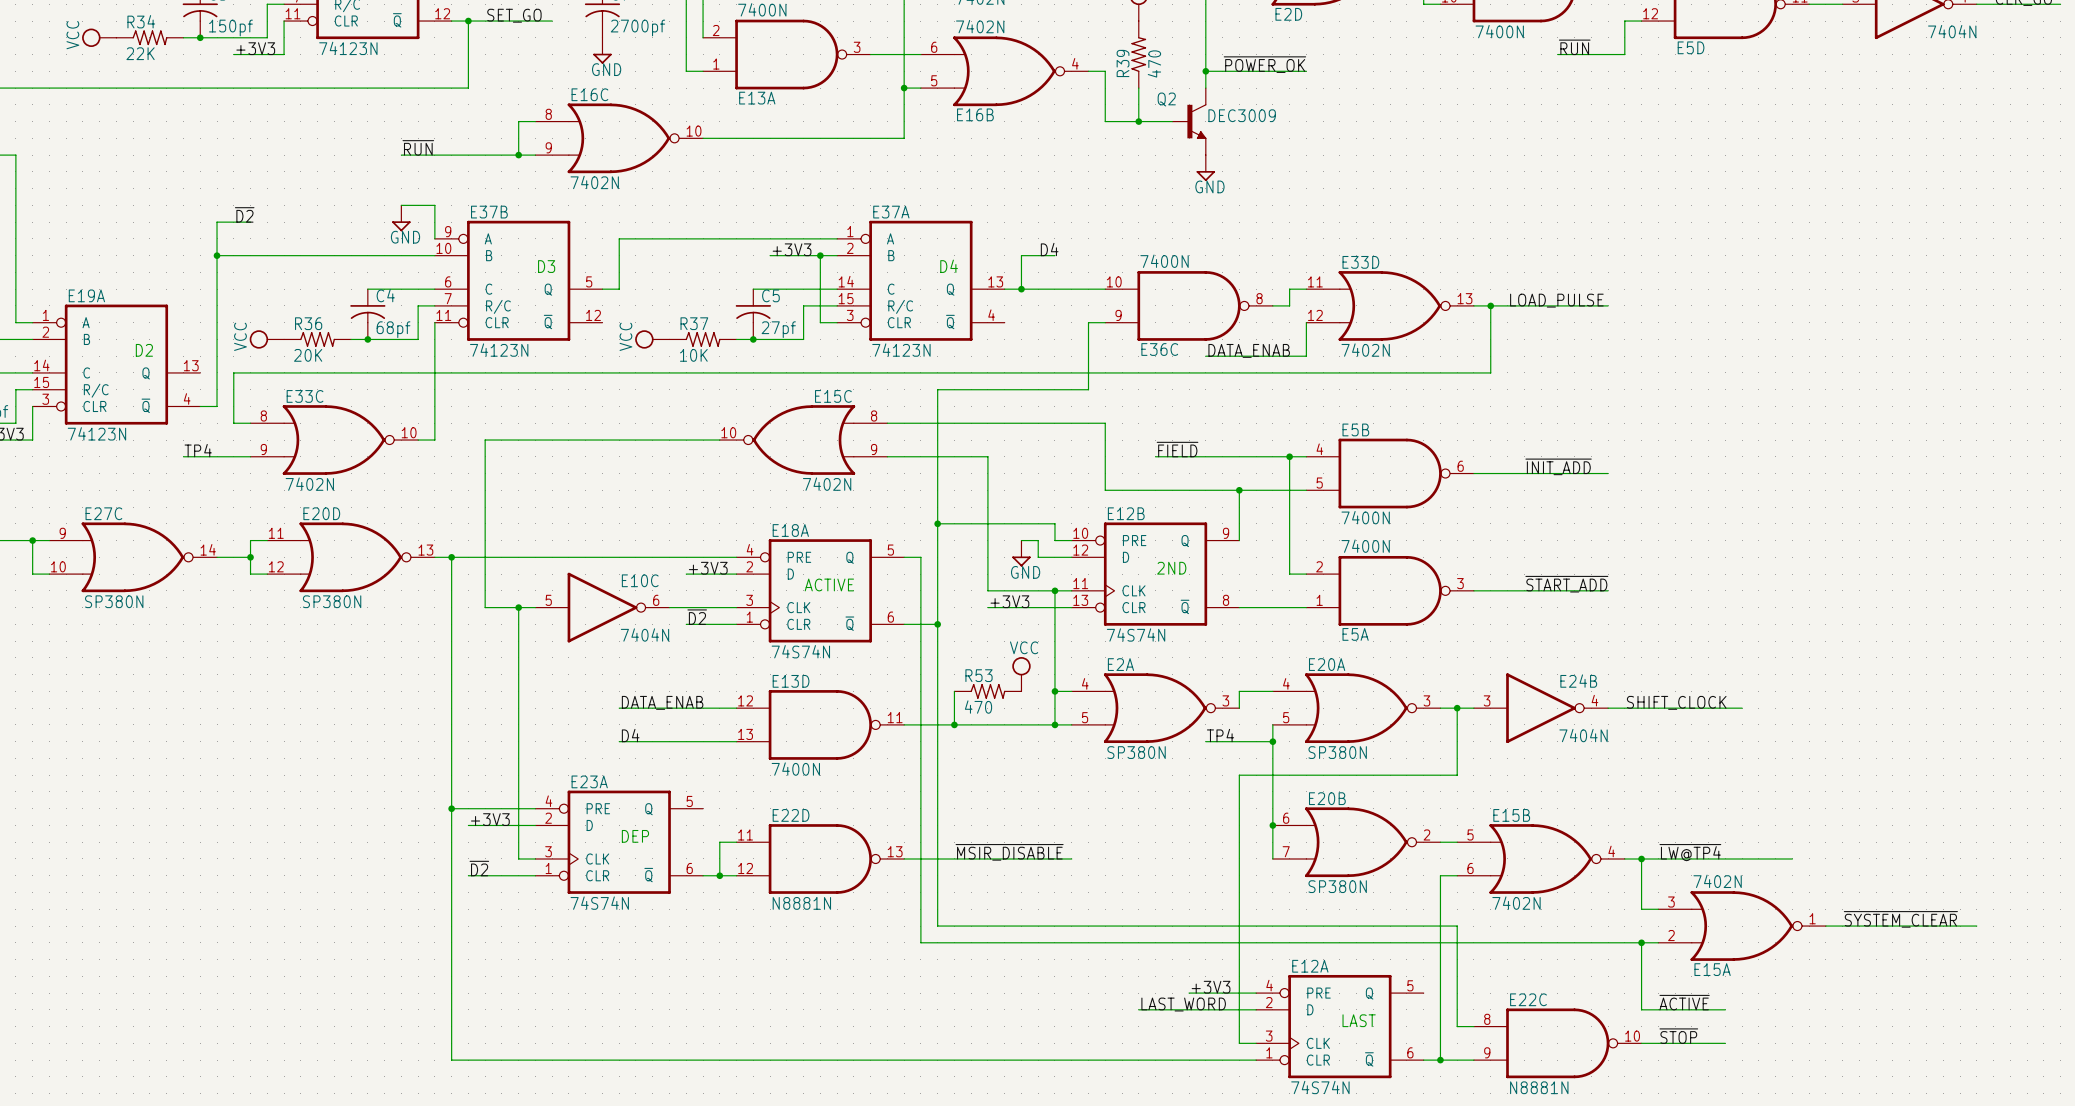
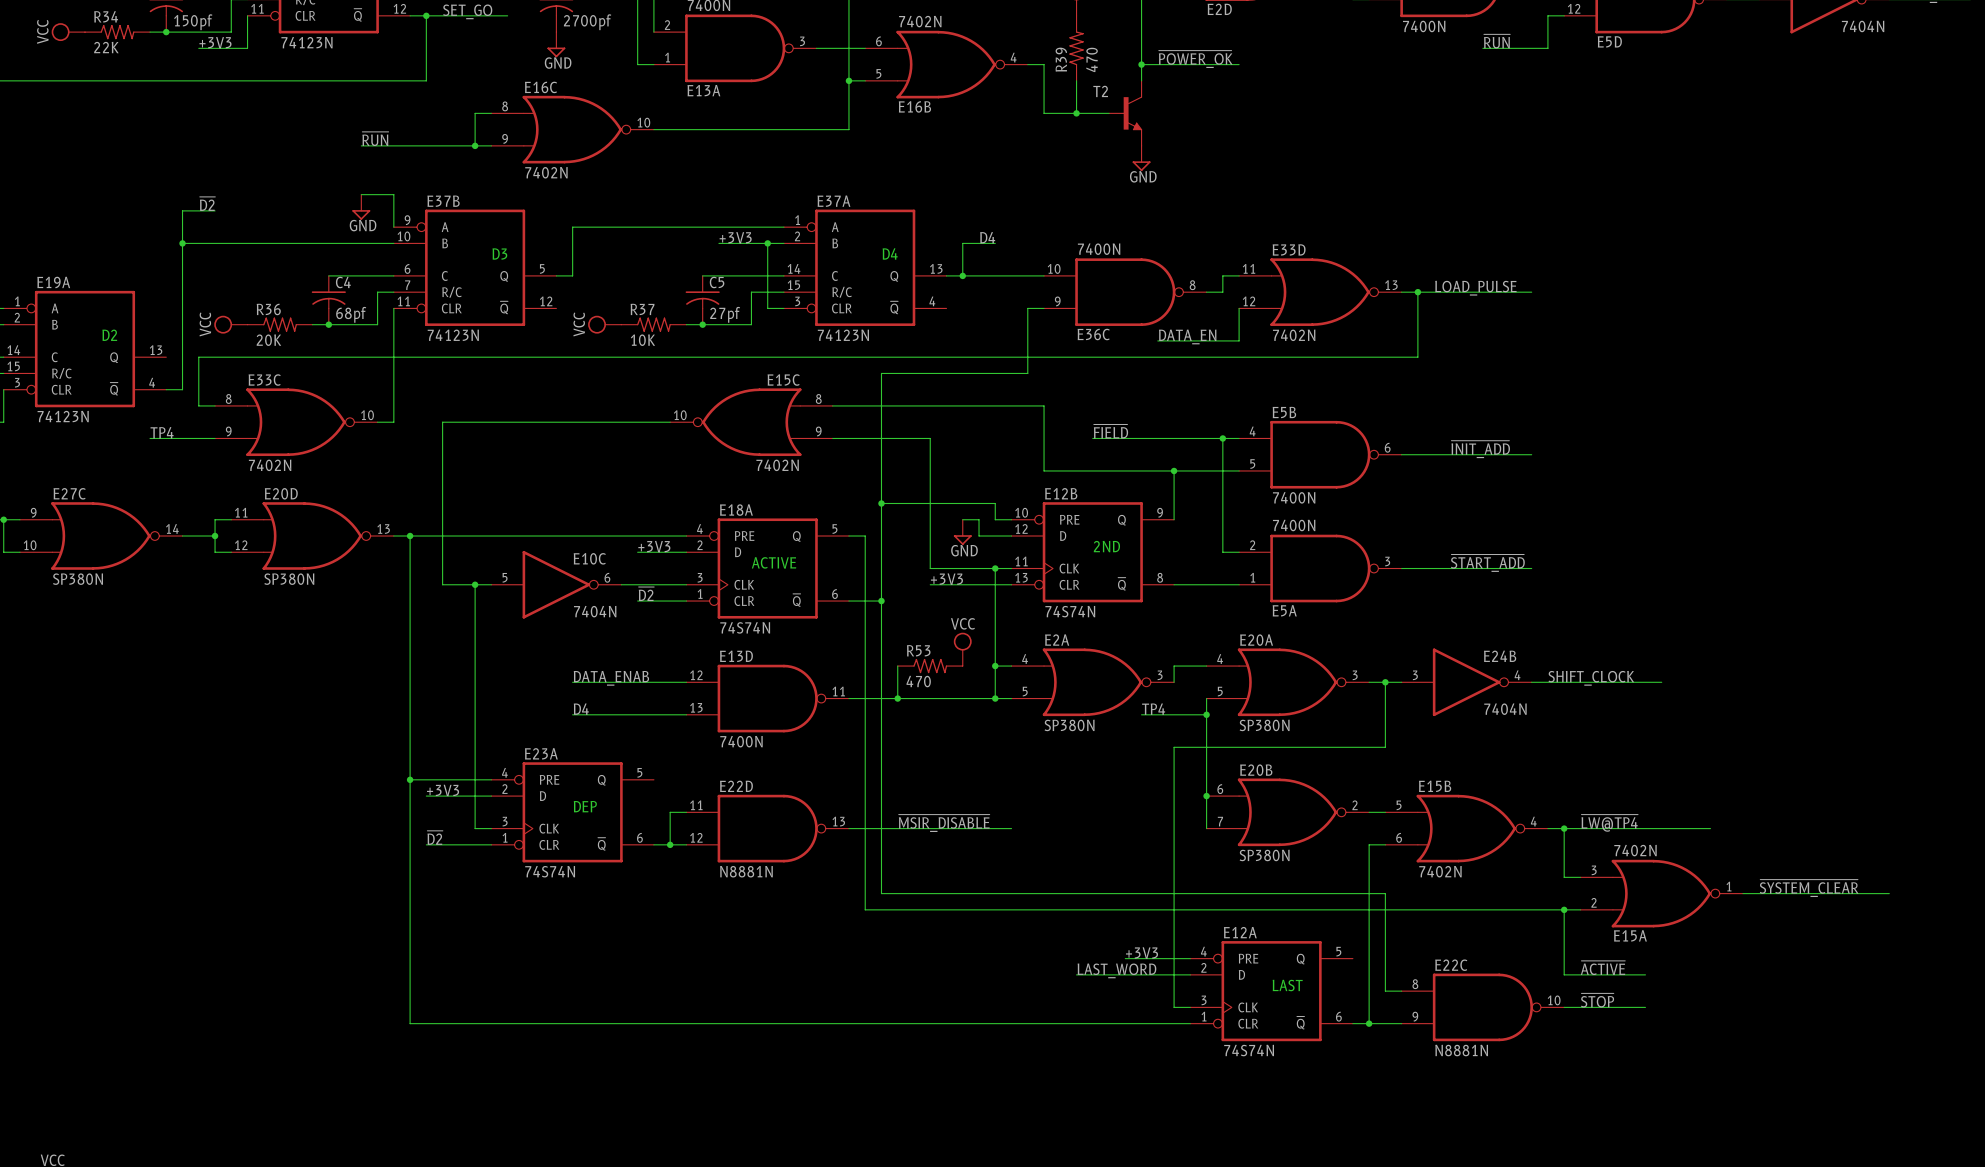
Q2 name: Q2 (1166, 99) -> T2 (1100, 91)
Q2 value: DEC3009 (1242, 115) -> none
label: DATA_ENAB (1249, 350) -> DATA_EN (1187, 336)
wire: (1205, 356) (1222, 356) -> none

